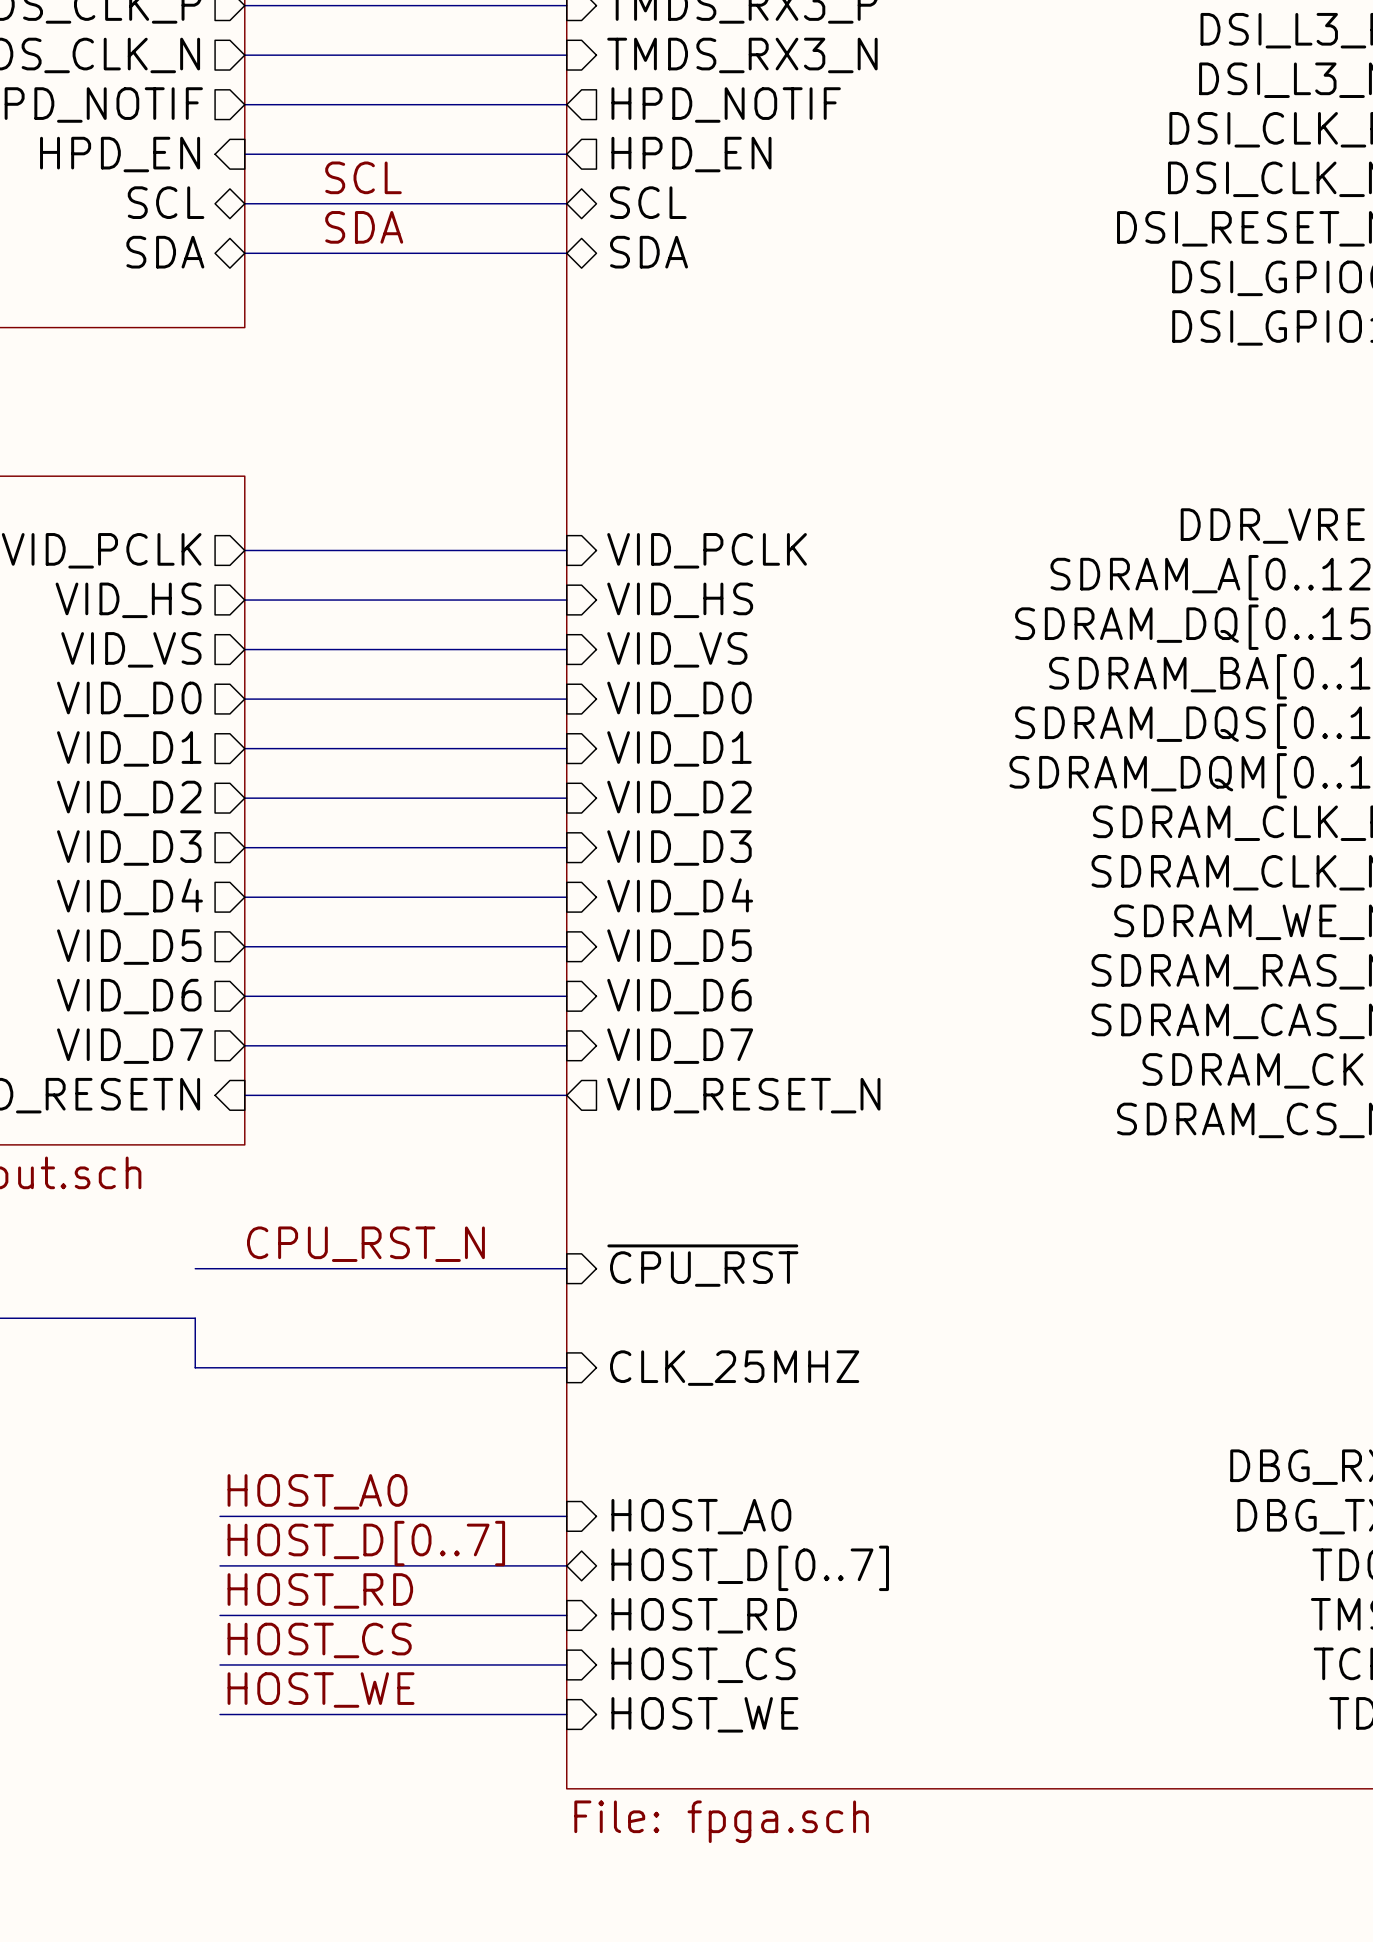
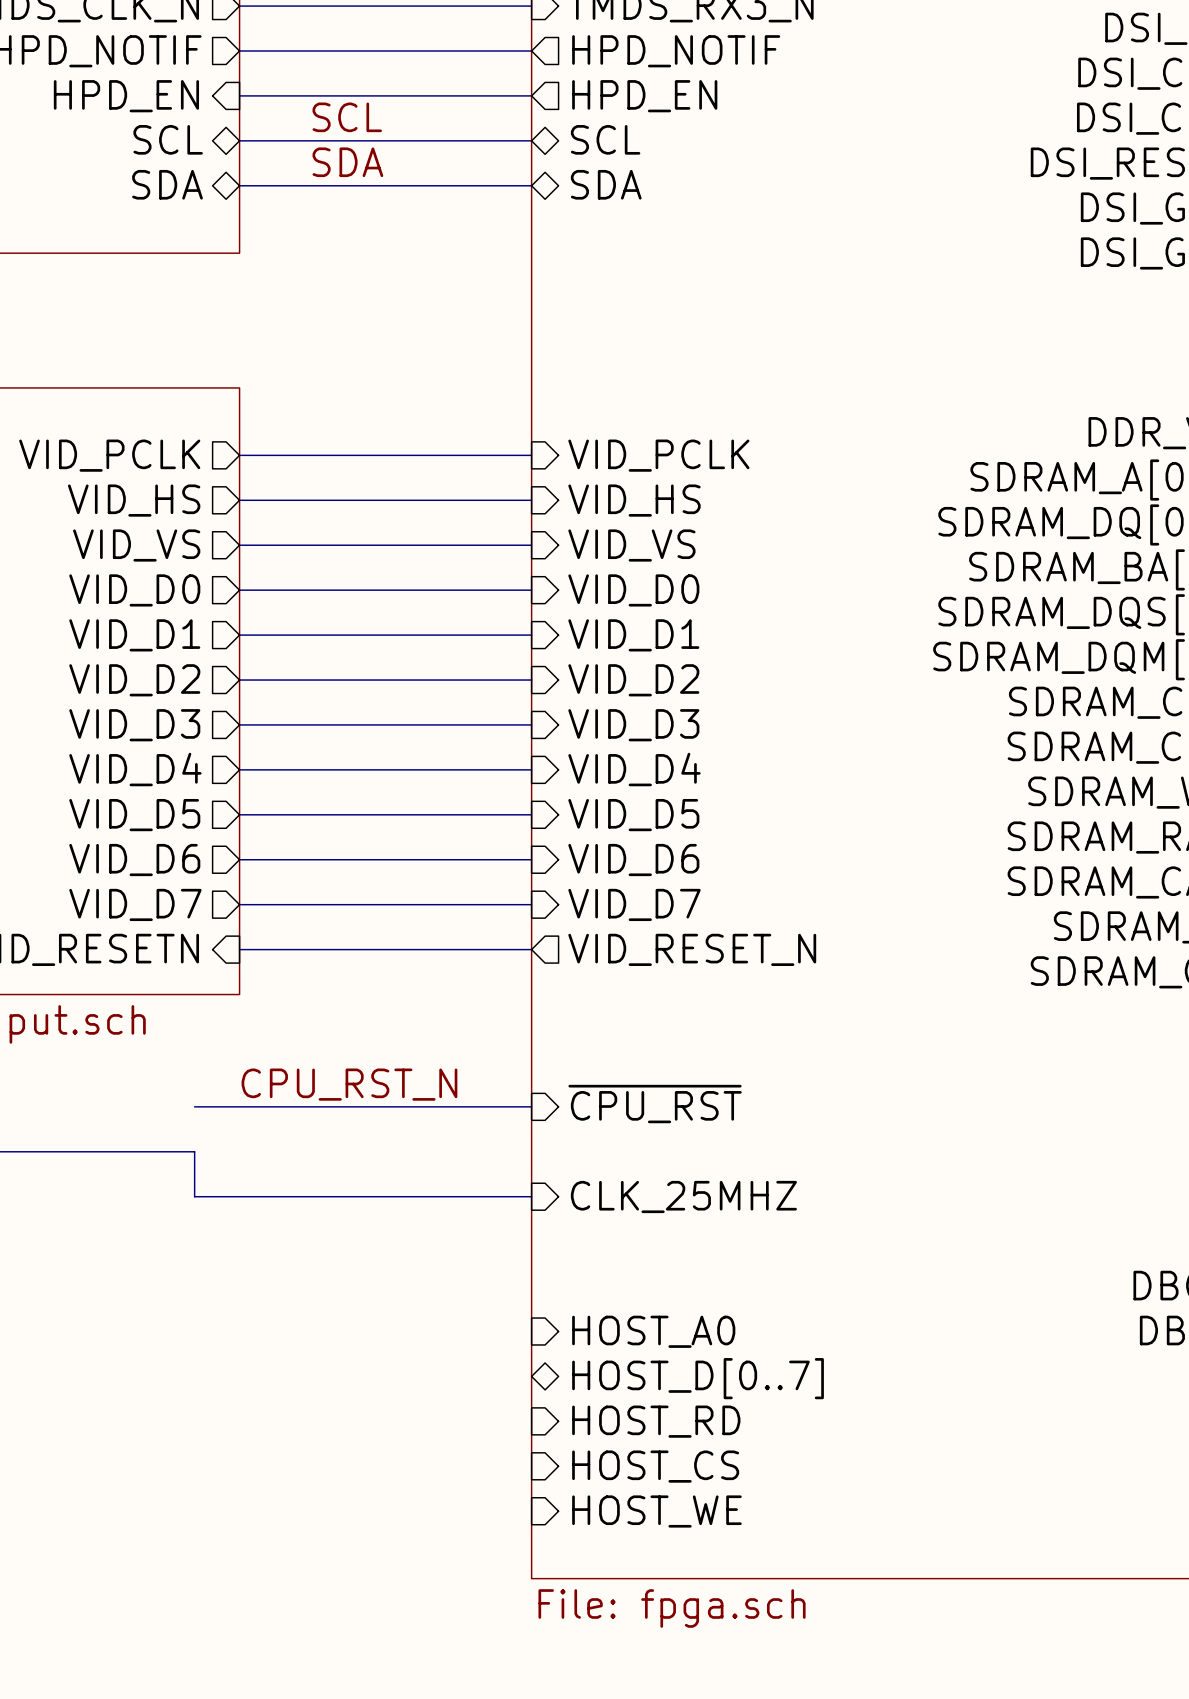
label: HOST_A0 (317, 1491) -> none
wire: (220, 1516) (566, 1516) -> none
label: HOST_D[0..7] (366, 1543) -> none
bus: (220, 1565) (566, 1565) -> none
label: HOST_RD (320, 1590) -> none
wire: (220, 1615) (566, 1615) -> none
label: HOST_CS (319, 1640) -> none
wire: (220, 1664) (566, 1664) -> none
label: HOST_WE (321, 1690) -> none
wire: (220, 1714) (566, 1714) -> none

